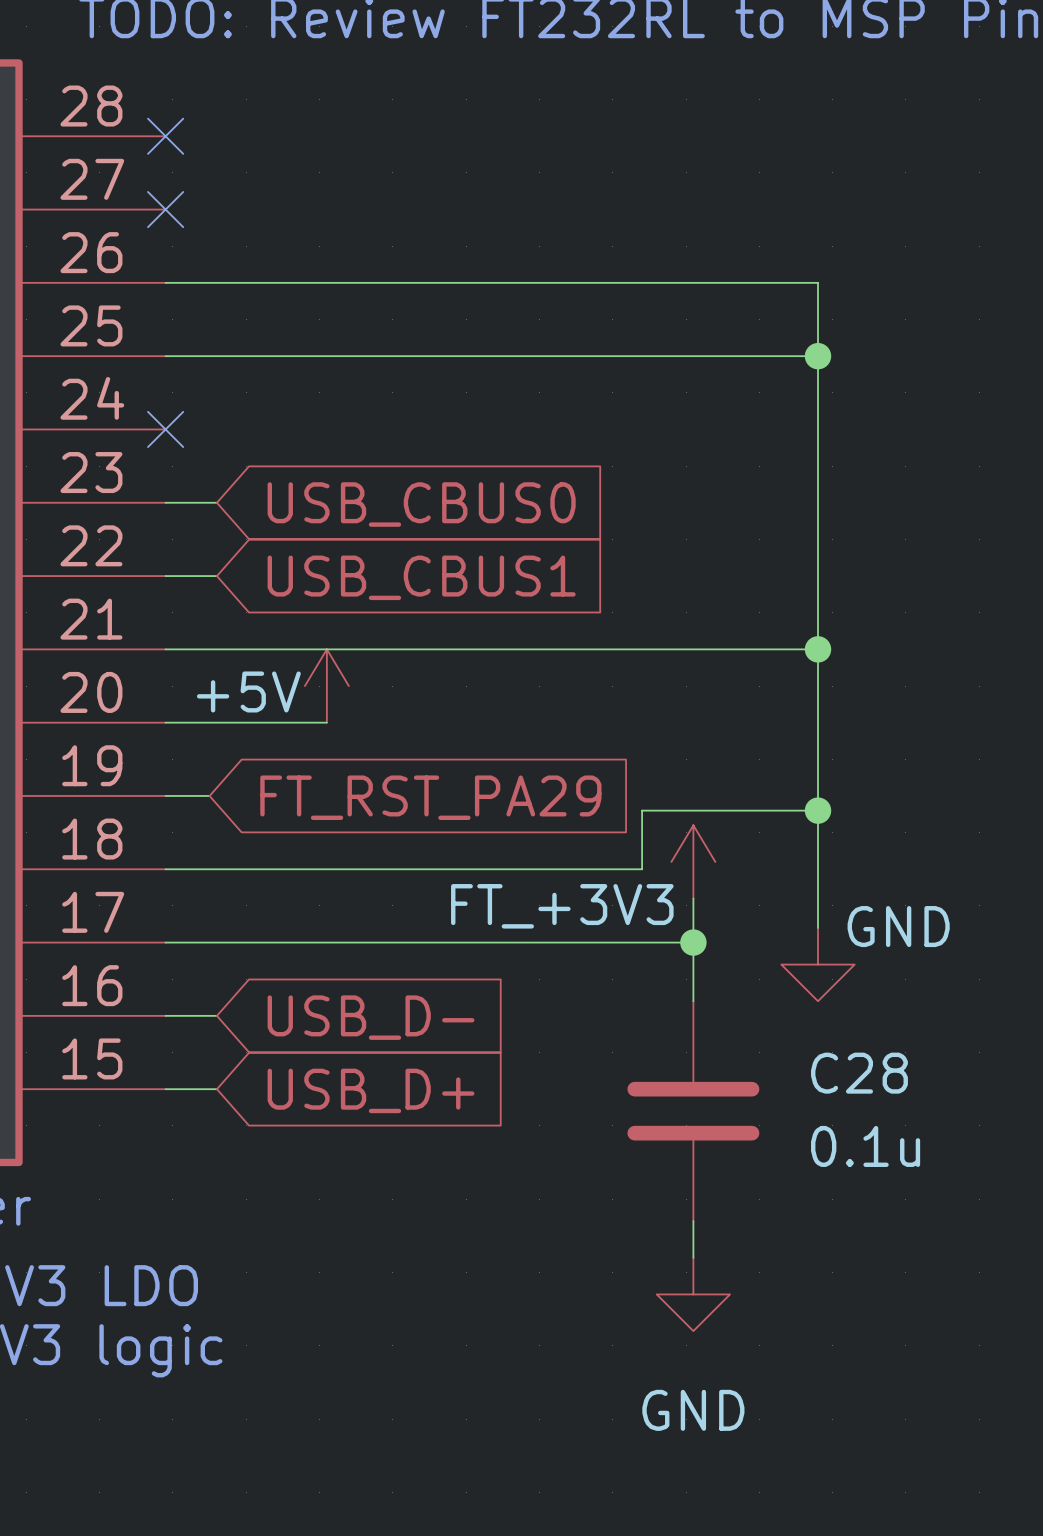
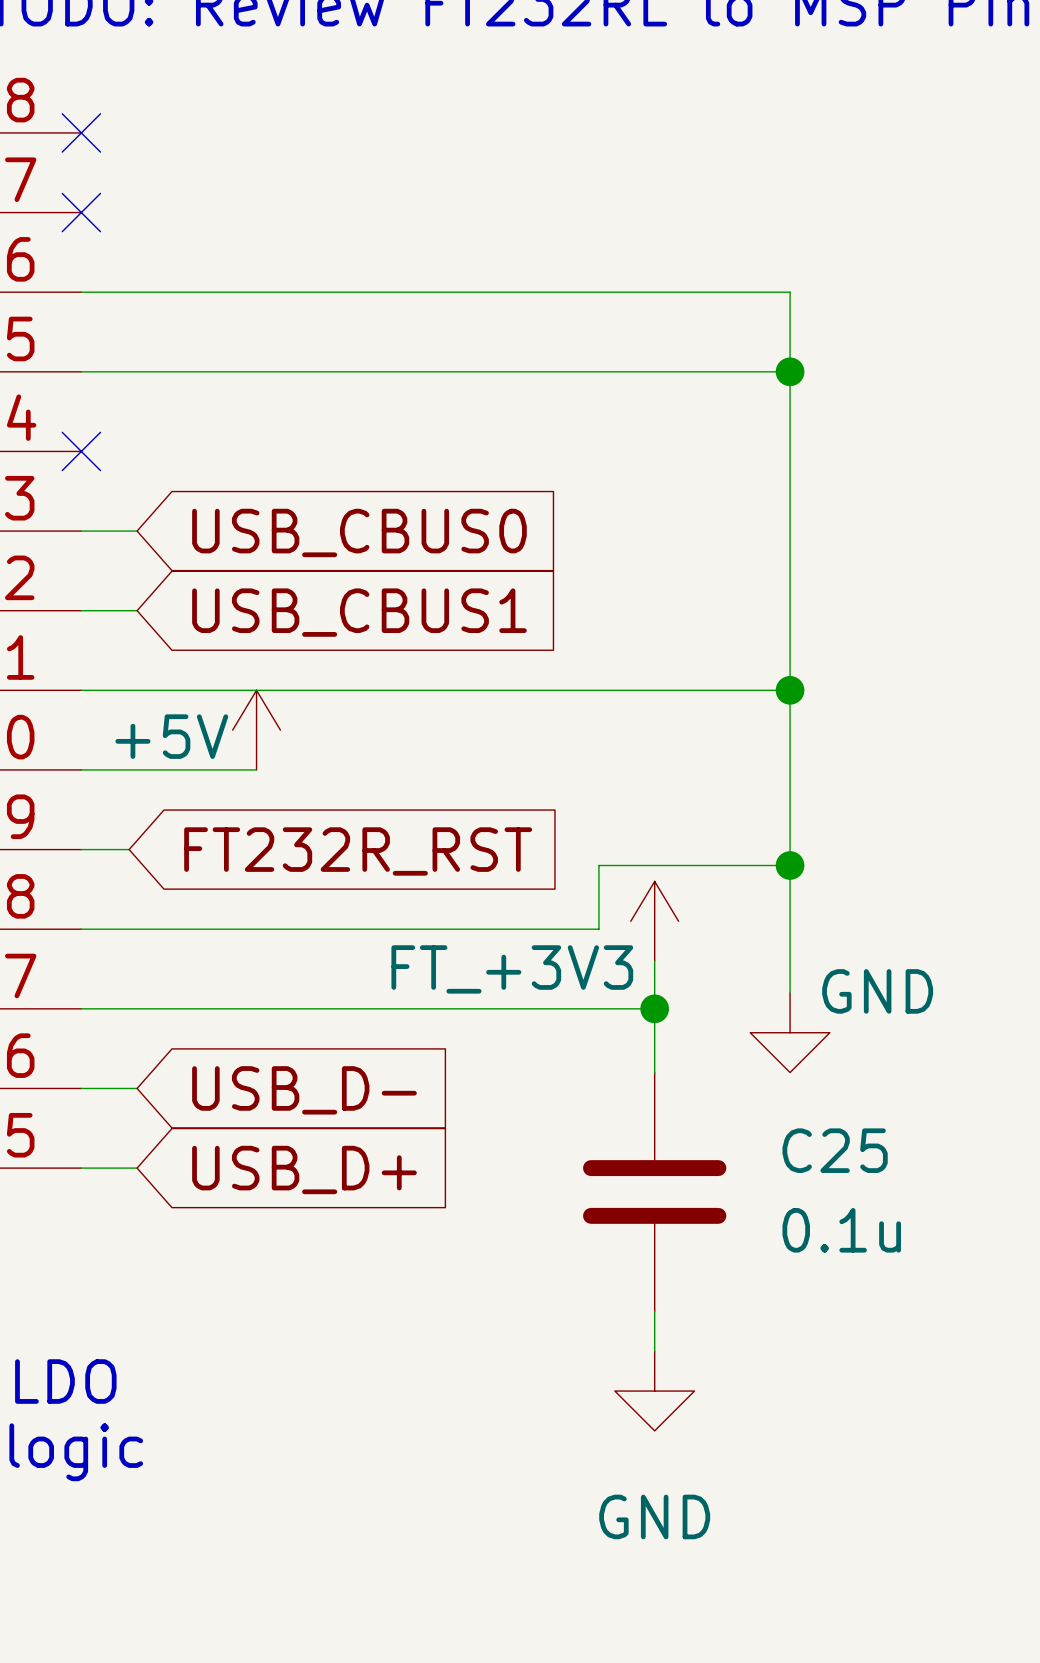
global label: FT_RST_PA29 (430, 797) -> FT232R_RST (358, 851)
C28 name: C28 (859, 1073) -> C25 (835, 1150)

